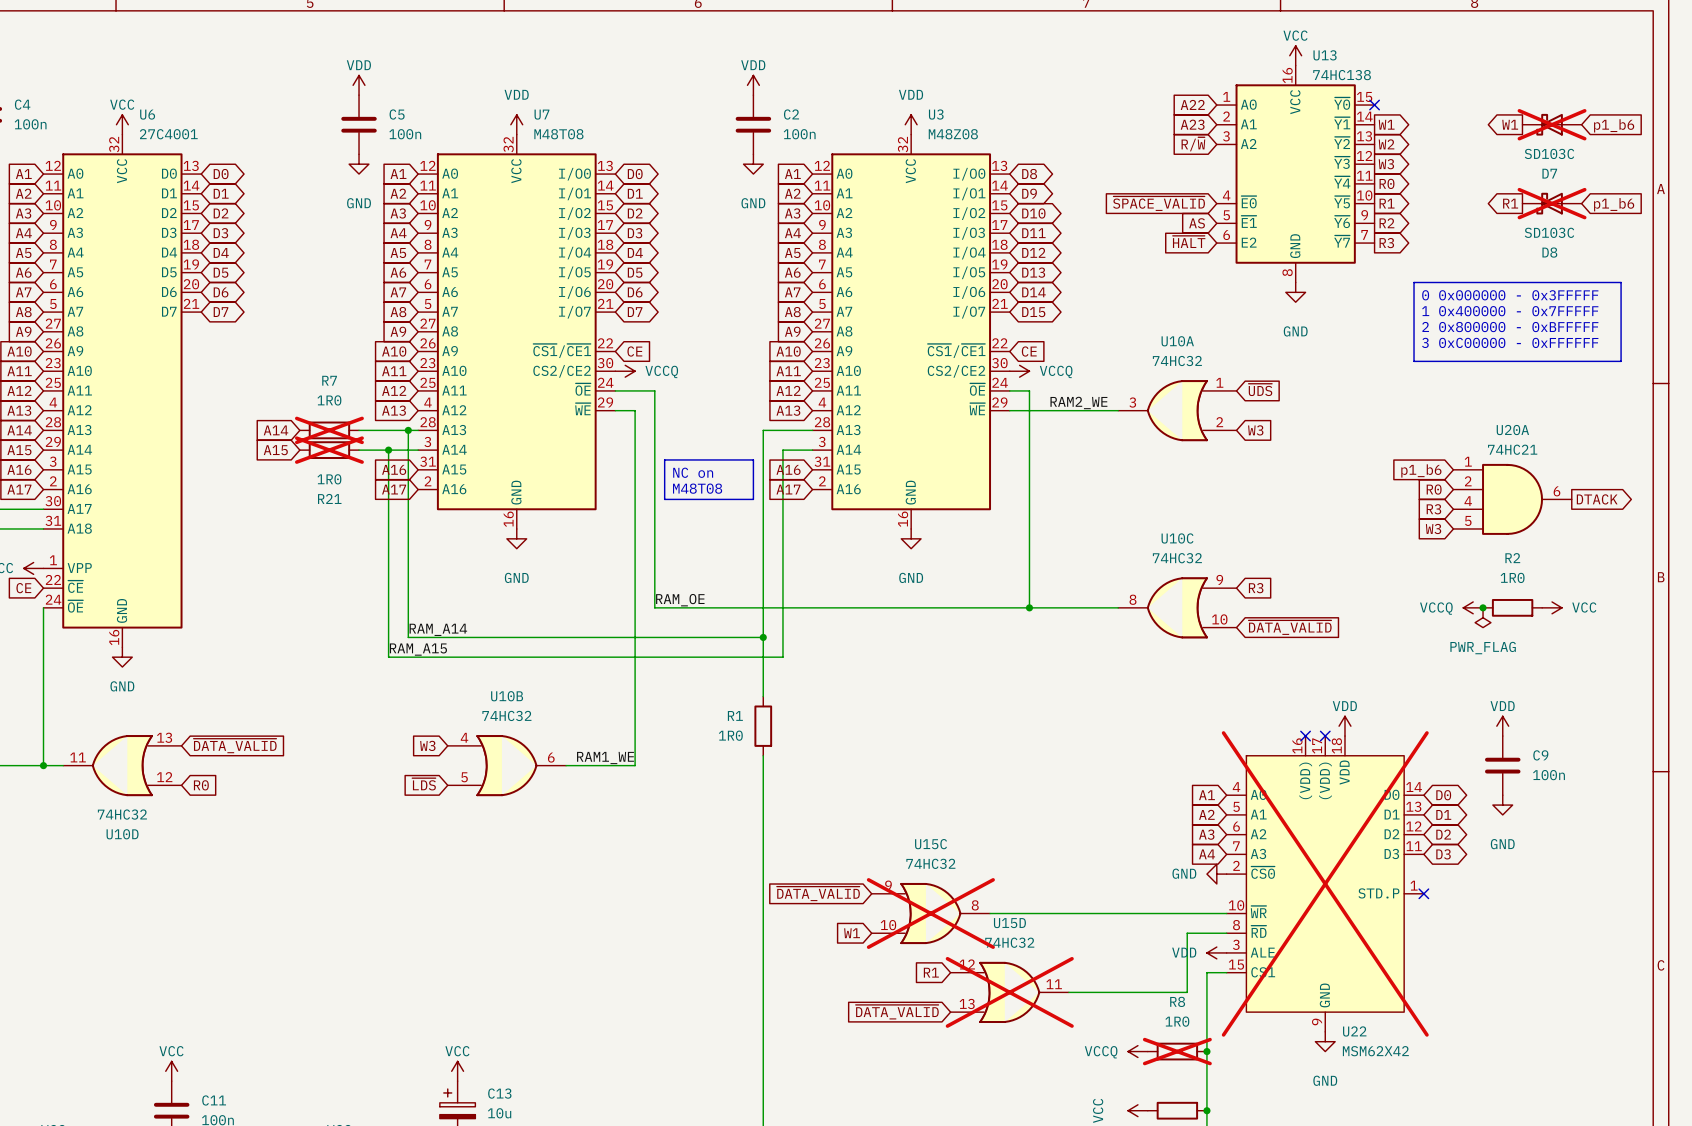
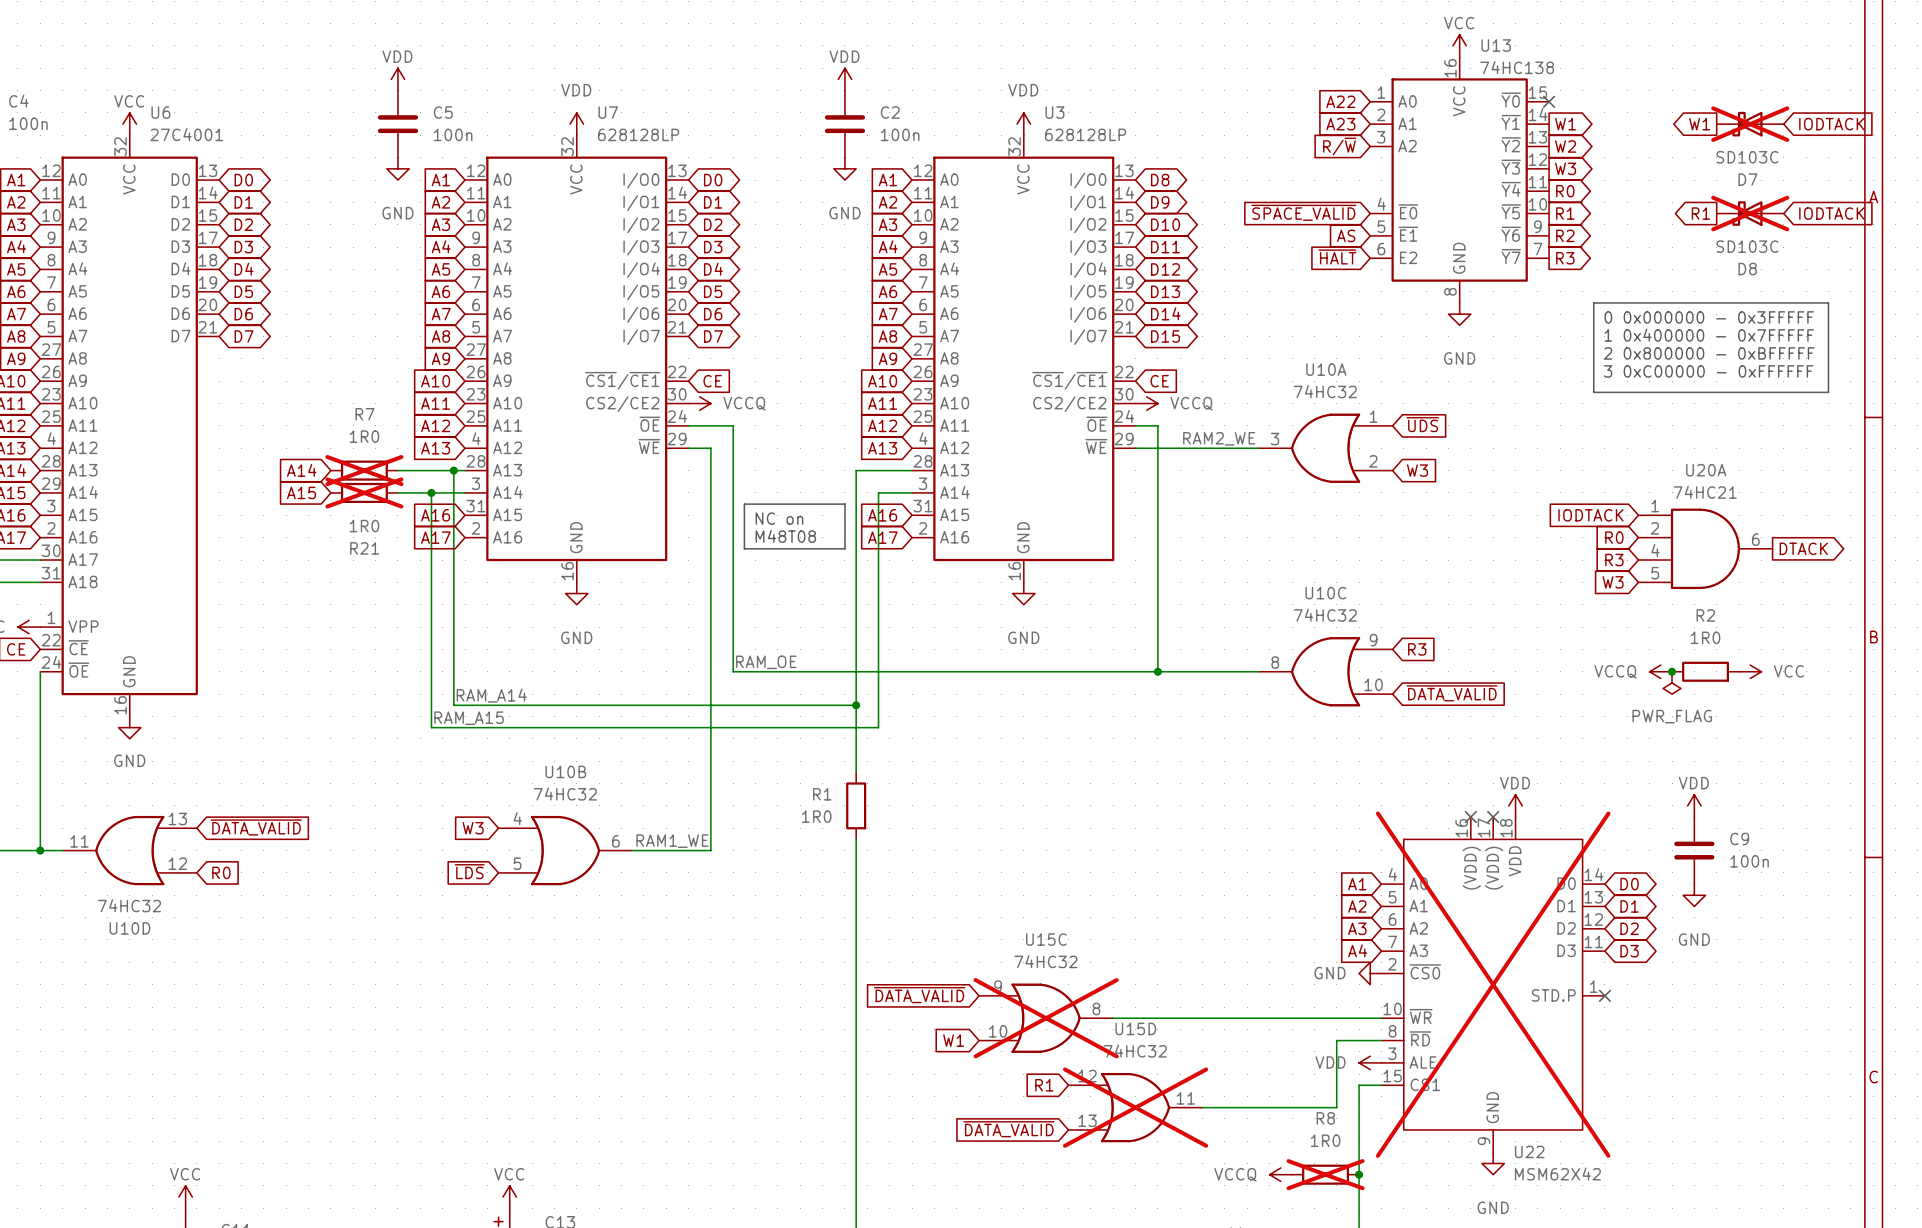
global label: p1_b6 (1614, 125) -> IODTACK (1831, 124)
U7 value: M48T08 (558, 134) -> 628128LP (638, 134)
U3 value: M48Z08 (953, 134) -> 628128LP (1085, 134)
global label: p1_b6 (1614, 204) -> IODTACK (1831, 213)
global label: p1_b6 (1421, 470) -> IODTACK (1590, 515)

